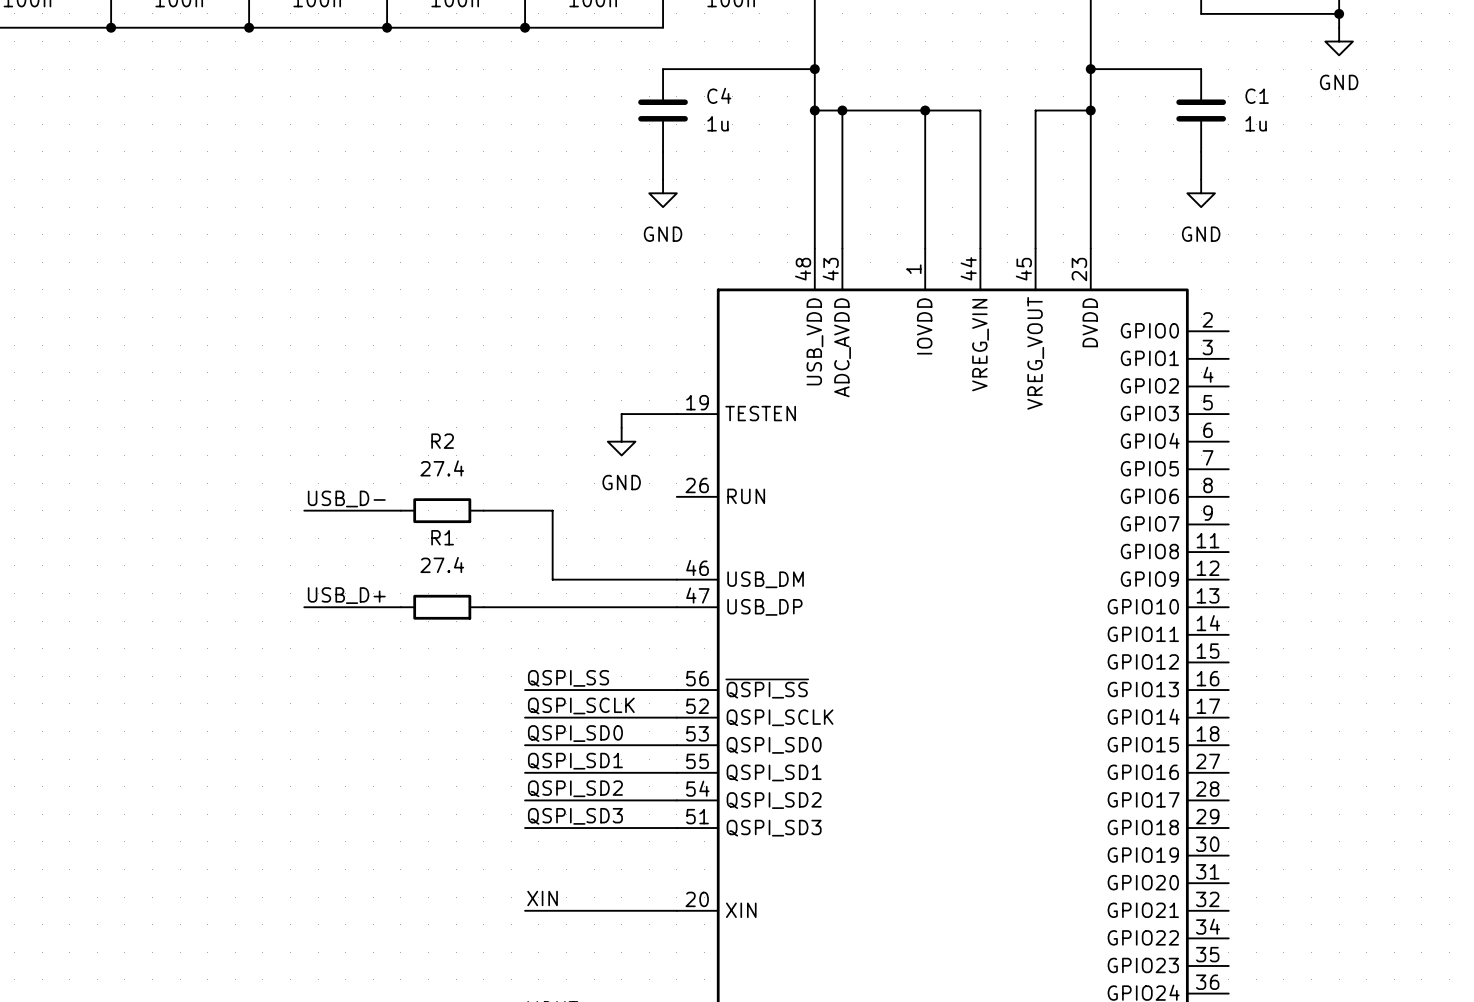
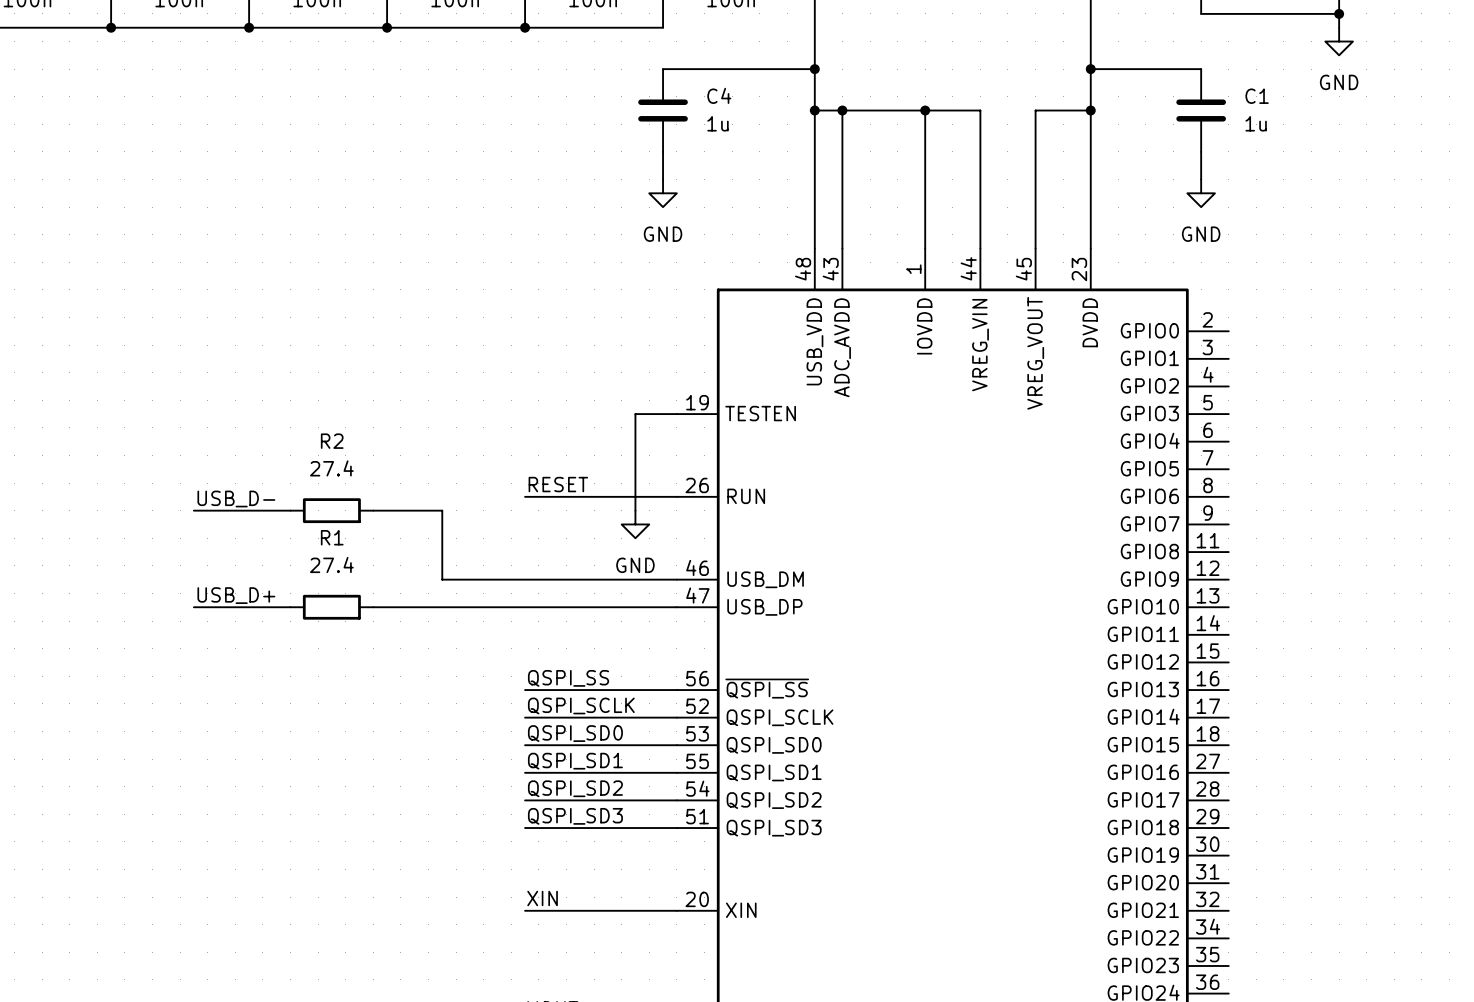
wire: (635, 414) (621, 414) (621, 427) -> (635, 414) (635, 510)
power symbol position: GND (621, 441) -> GND (635, 524)
label: none -> RESET (558, 484)
wire: none -> (525, 496) (676, 496)
label position: USB_D- (346, 499) -> USB_D- (236, 499)
wire: none -> (193, 510) (290, 510)
wire: (304, 510) (373, 510) -> none
R2 position: (442, 510) -> (331, 510)
wire: (483, 510) (552, 510) (552, 579) -> (400, 510) (442, 510) (442, 579) (552, 579)
label position: USB_D+ (346, 595) -> USB_D+ (236, 595)
wire: none -> (193, 607) (290, 607)
wire: (304, 607) (373, 607) -> none
wire: none -> (400, 607) (483, 607)
R1 position: (442, 607) -> (331, 607)

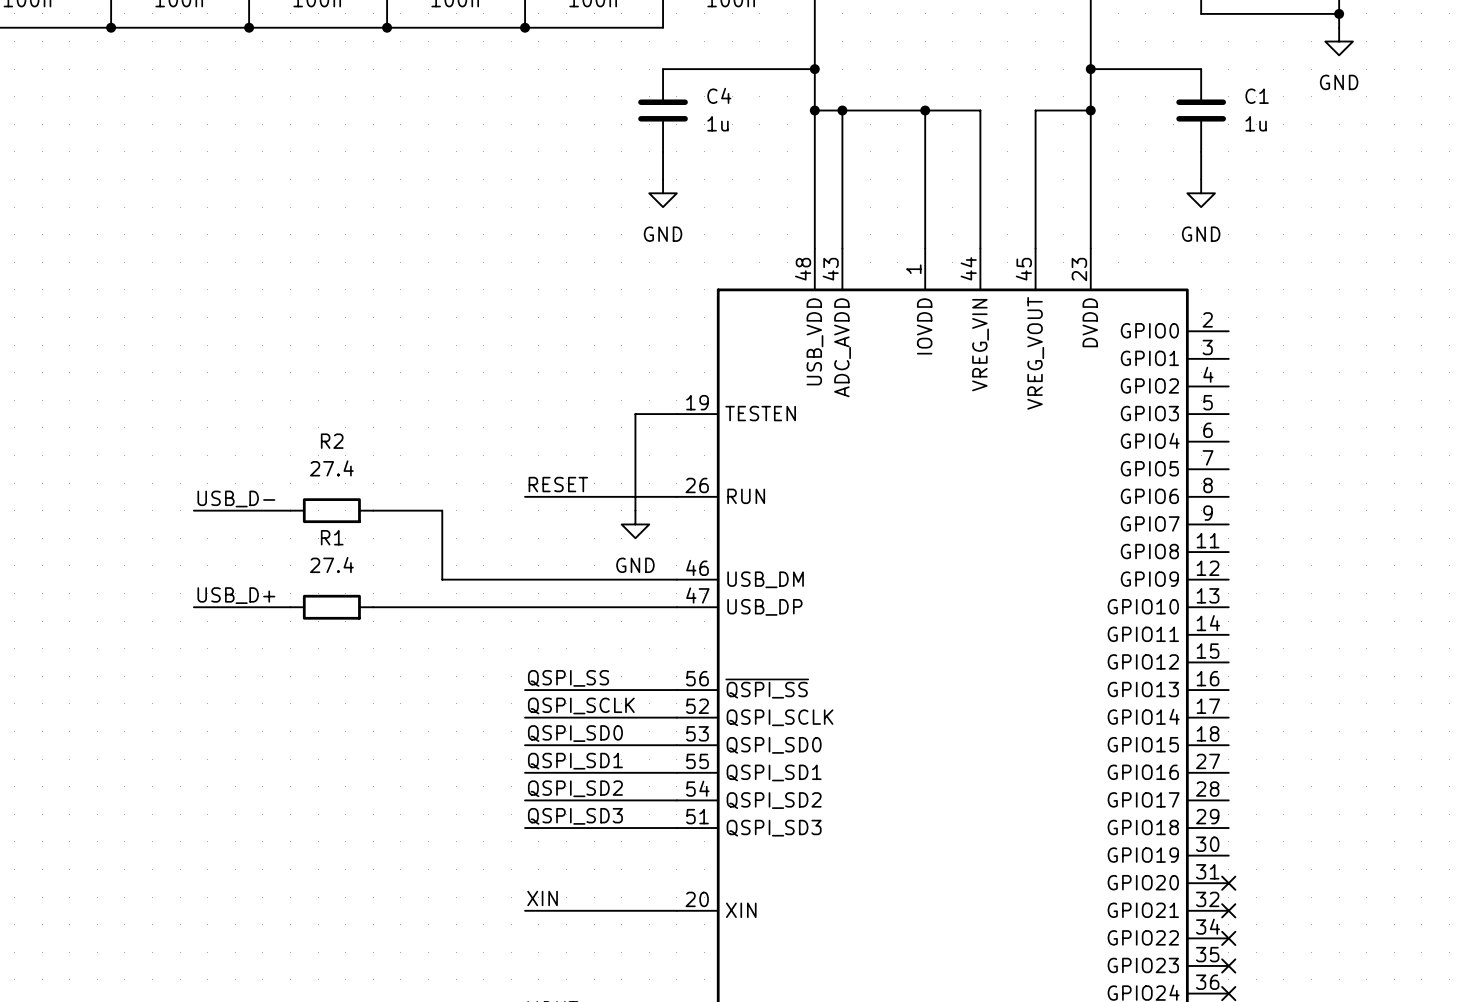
no-connect mark: none -> (1228, 883)
no-connect mark: none -> (1228, 910)
no-connect mark: none -> (1228, 938)
no-connect mark: none -> (1228, 965)
no-connect mark: none -> (1228, 993)

